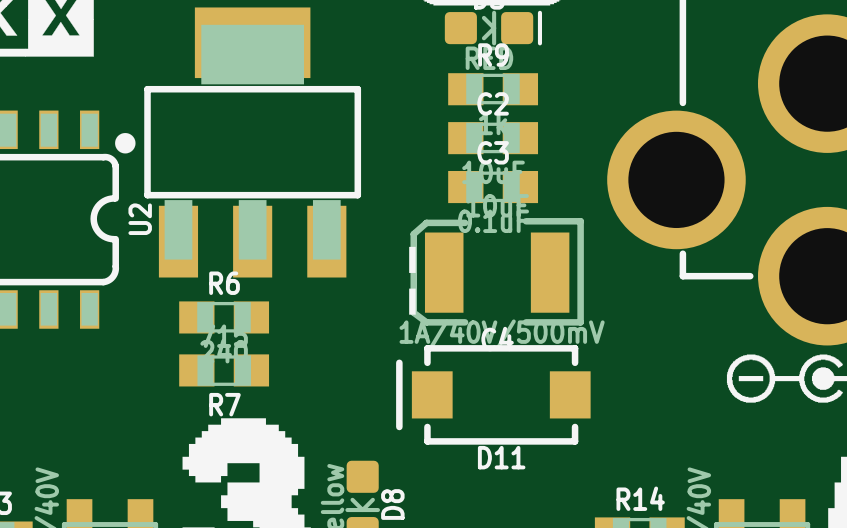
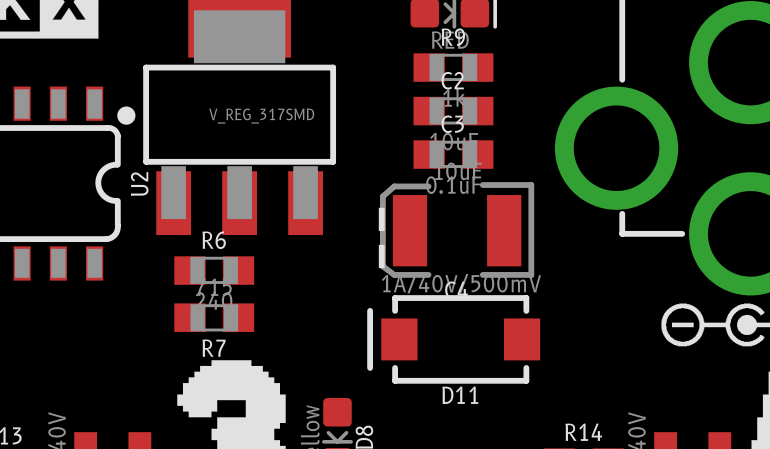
part value: none -> V_REG_317SMD (261, 116)

